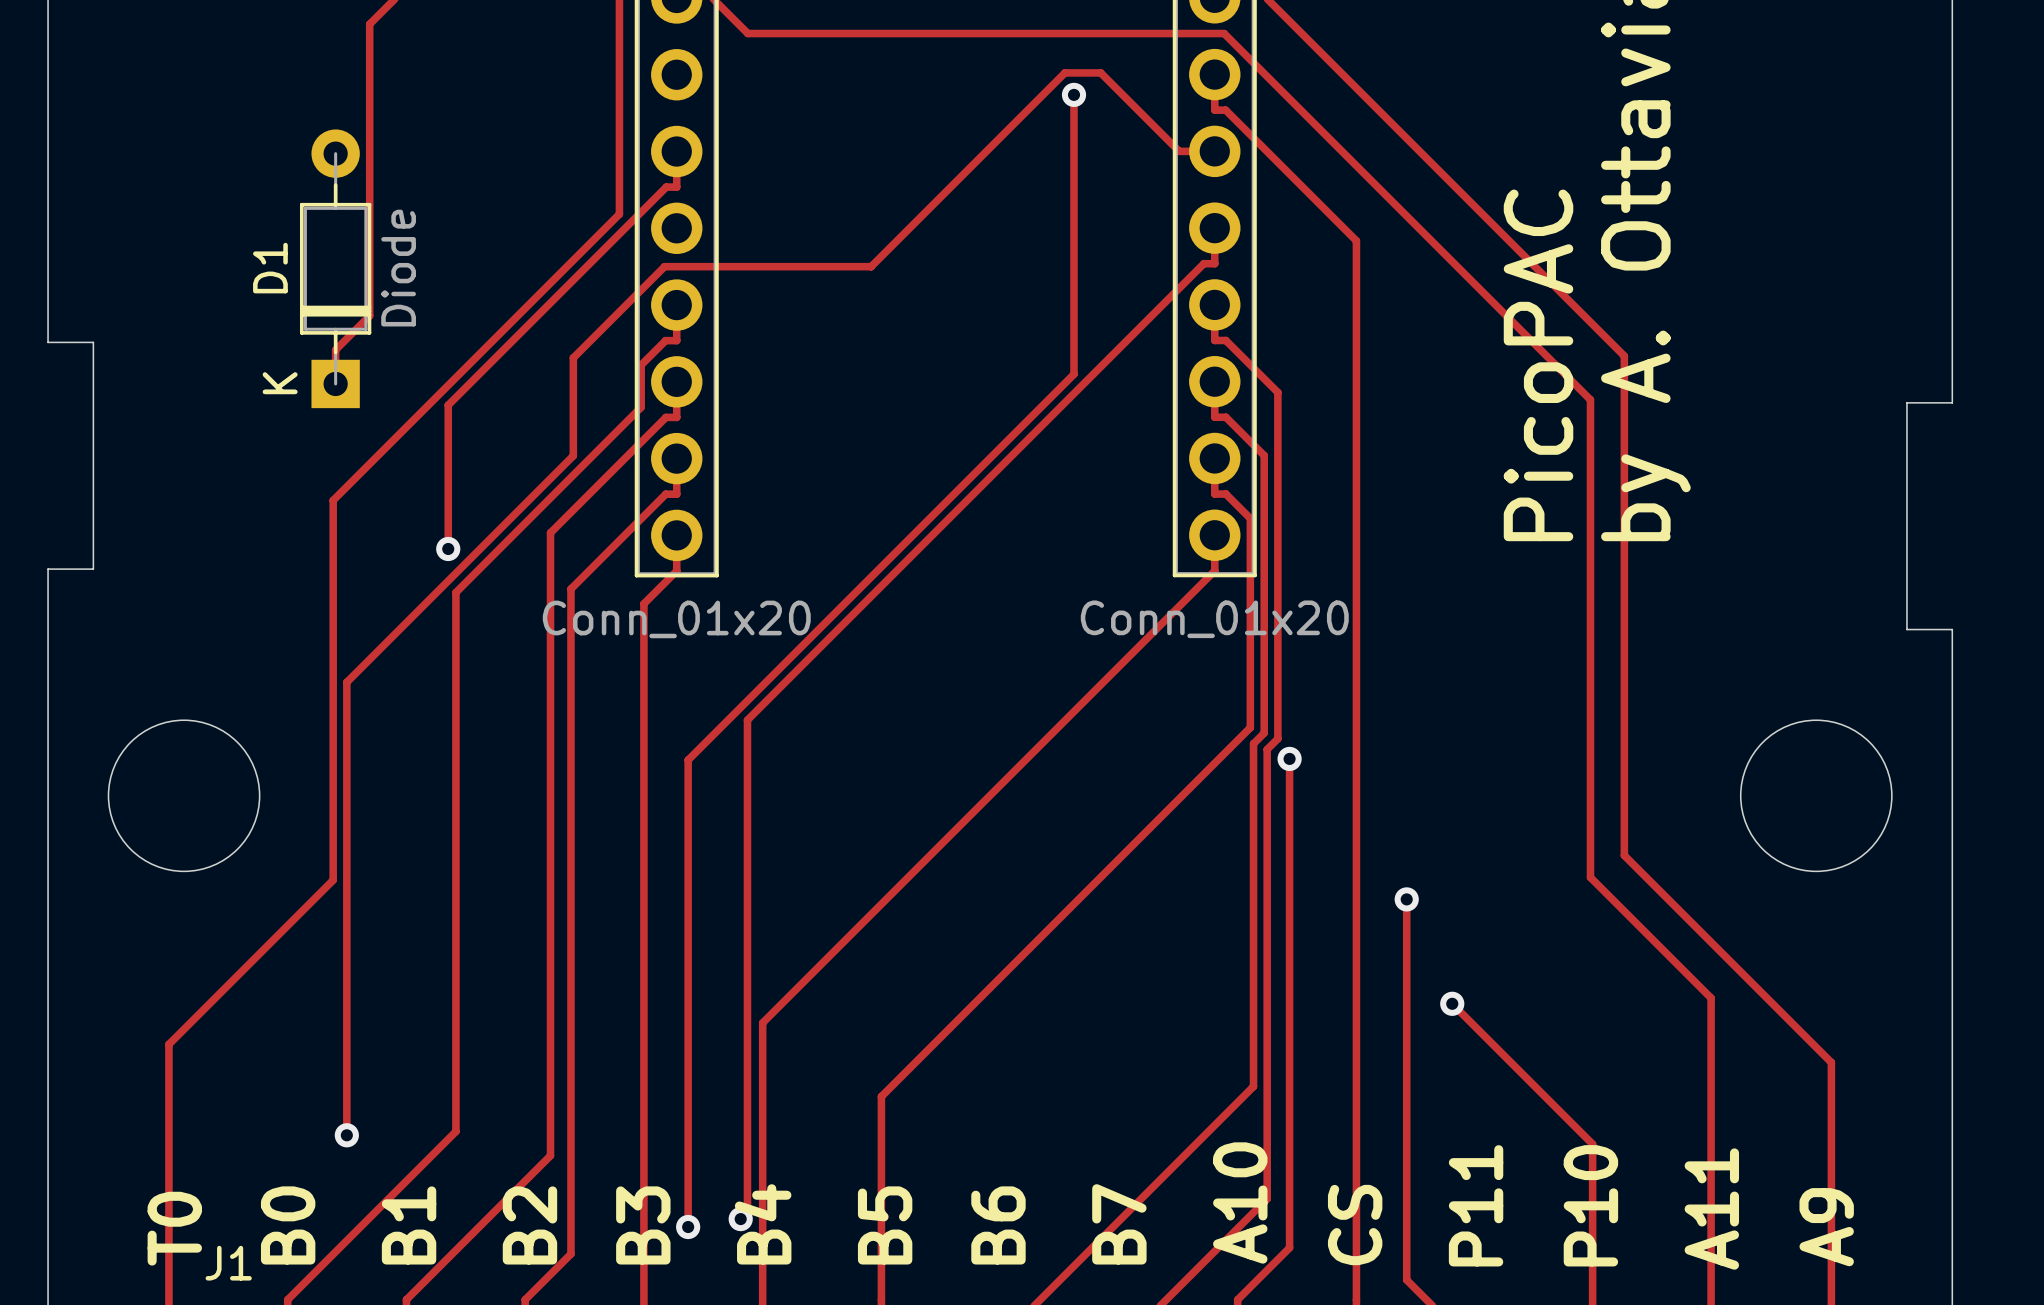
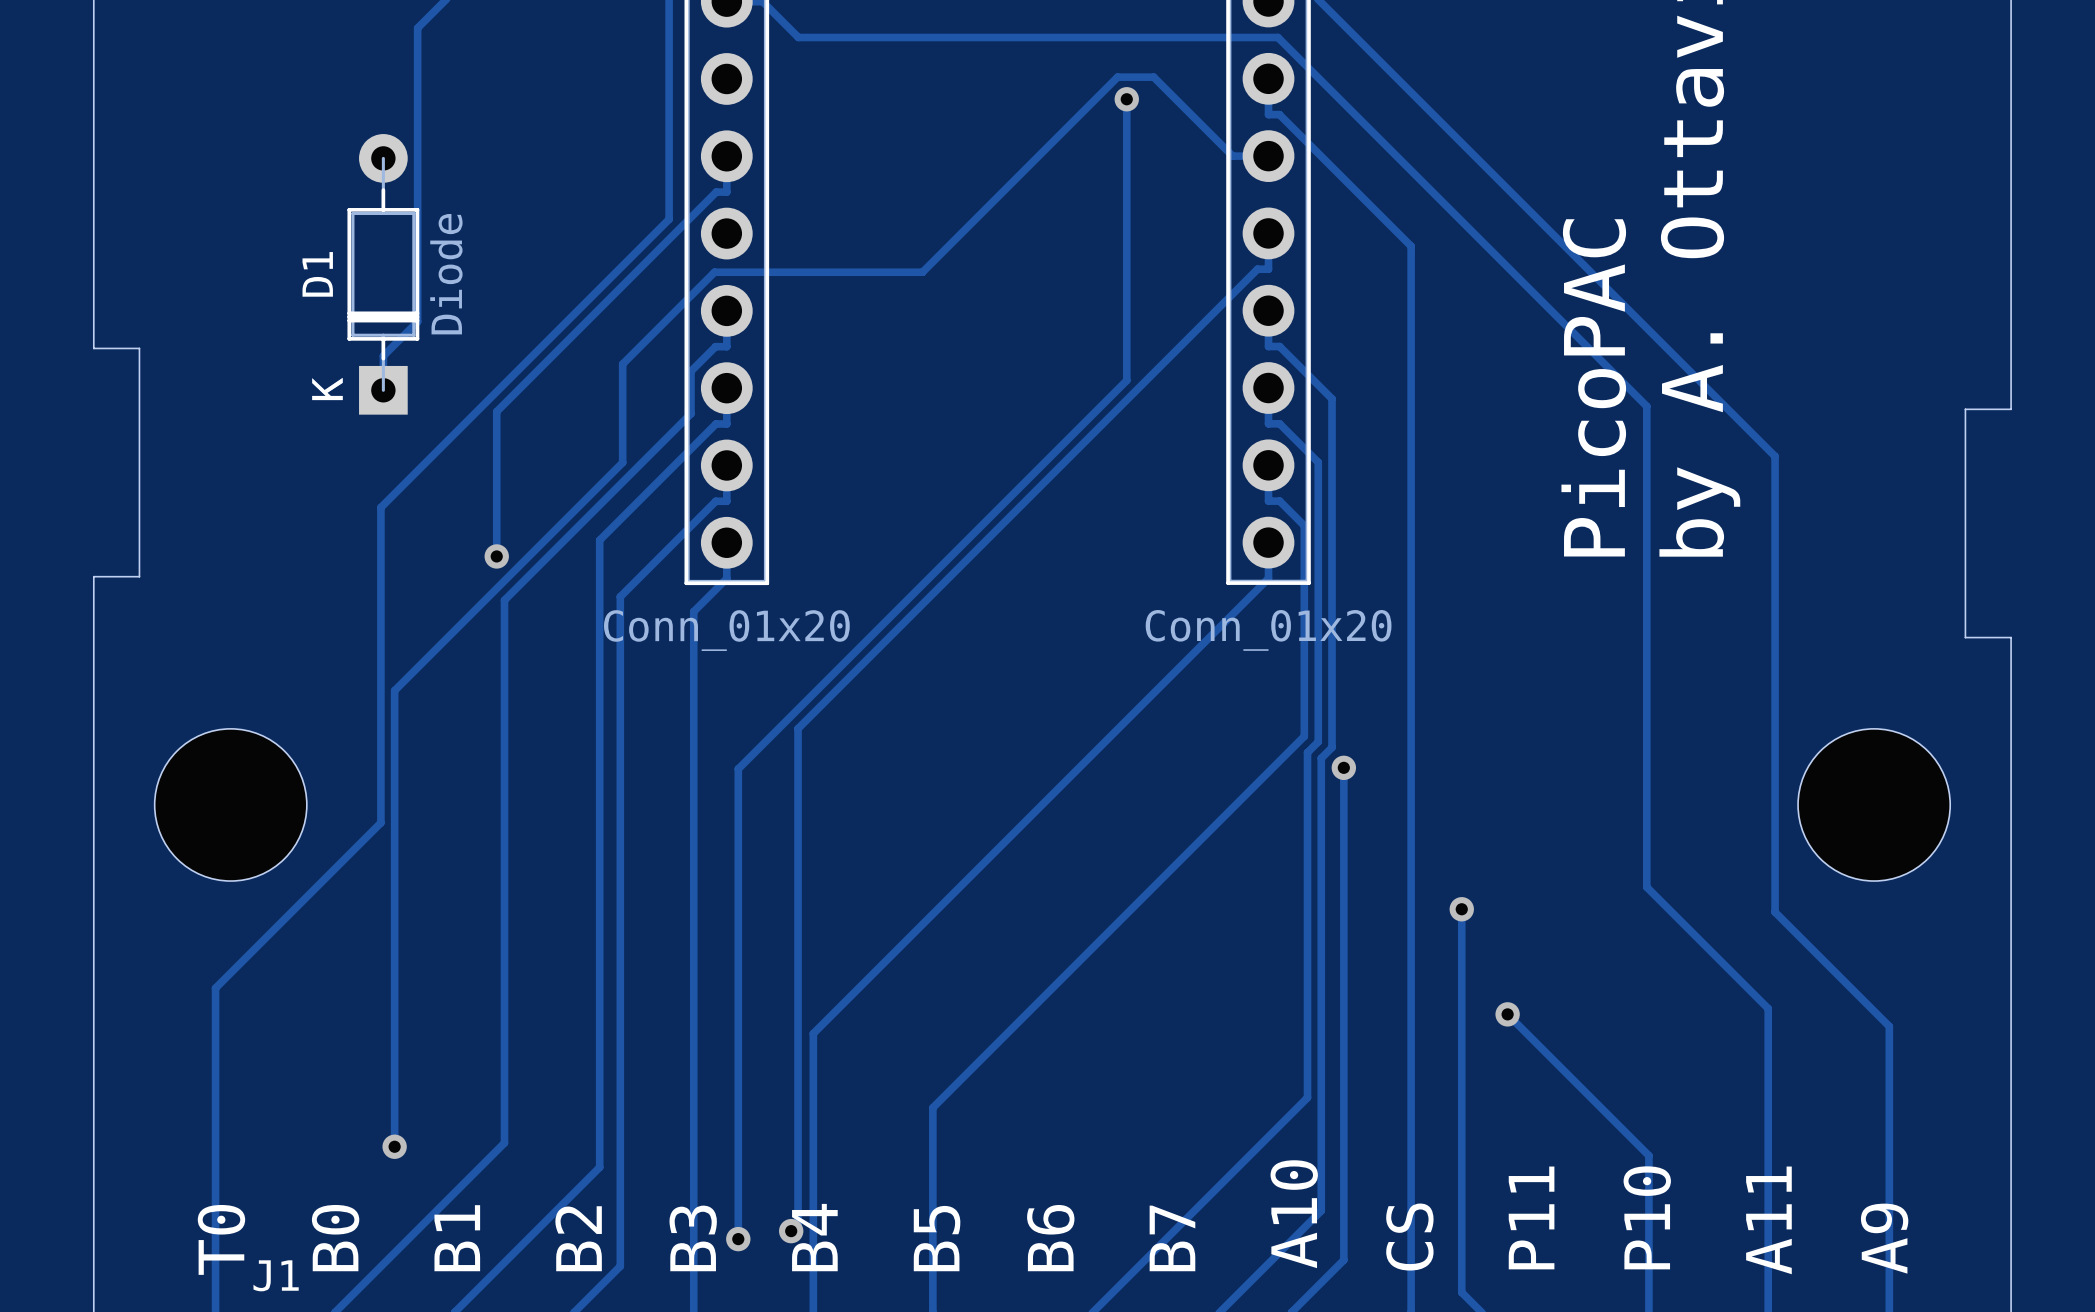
track: (1624, 356) (1624, 855) (1831, 1062) -> (1680, 362) (1775, 456) (1775, 912) (1889, 1026) (1889, 1073)
track: (333, 813) (333, 880) (168, 1044) -> (380, 822) (215, 988) (215, 1055)

